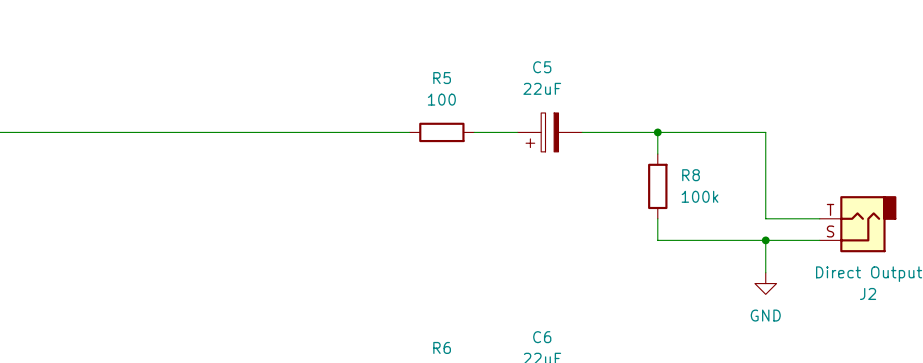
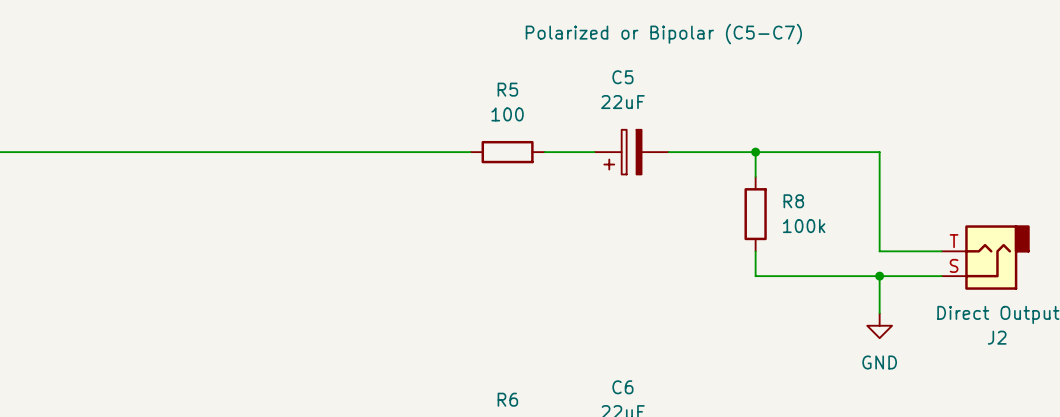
C5 text: none -> Polarized or Bipolar (C5-C7) (663, 34)

